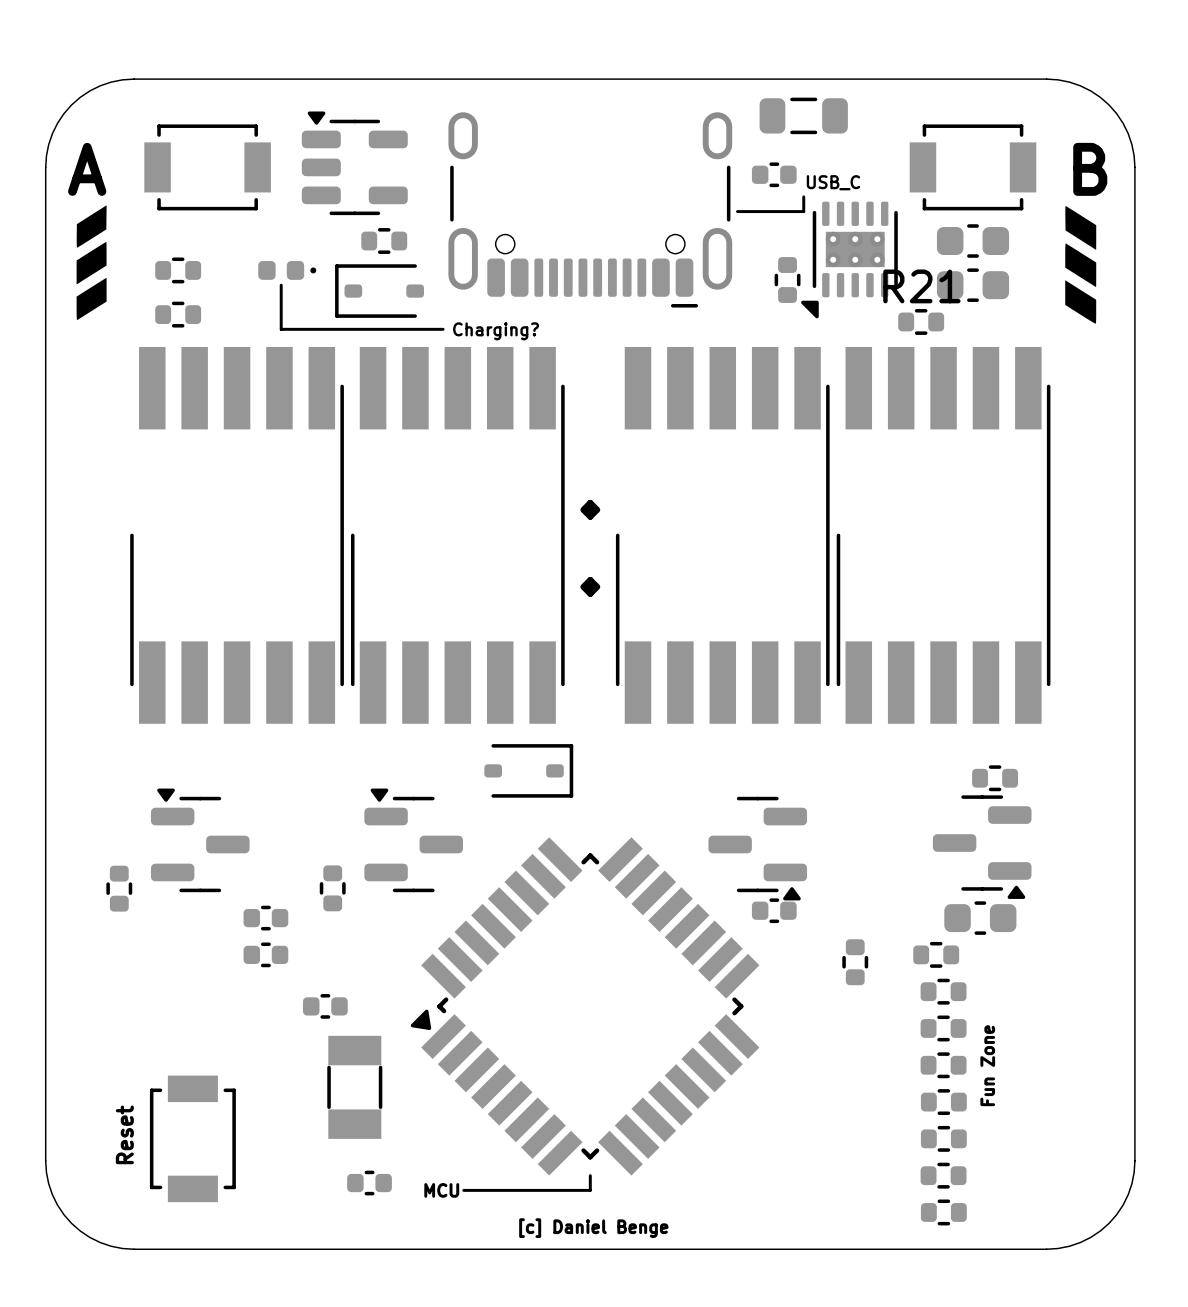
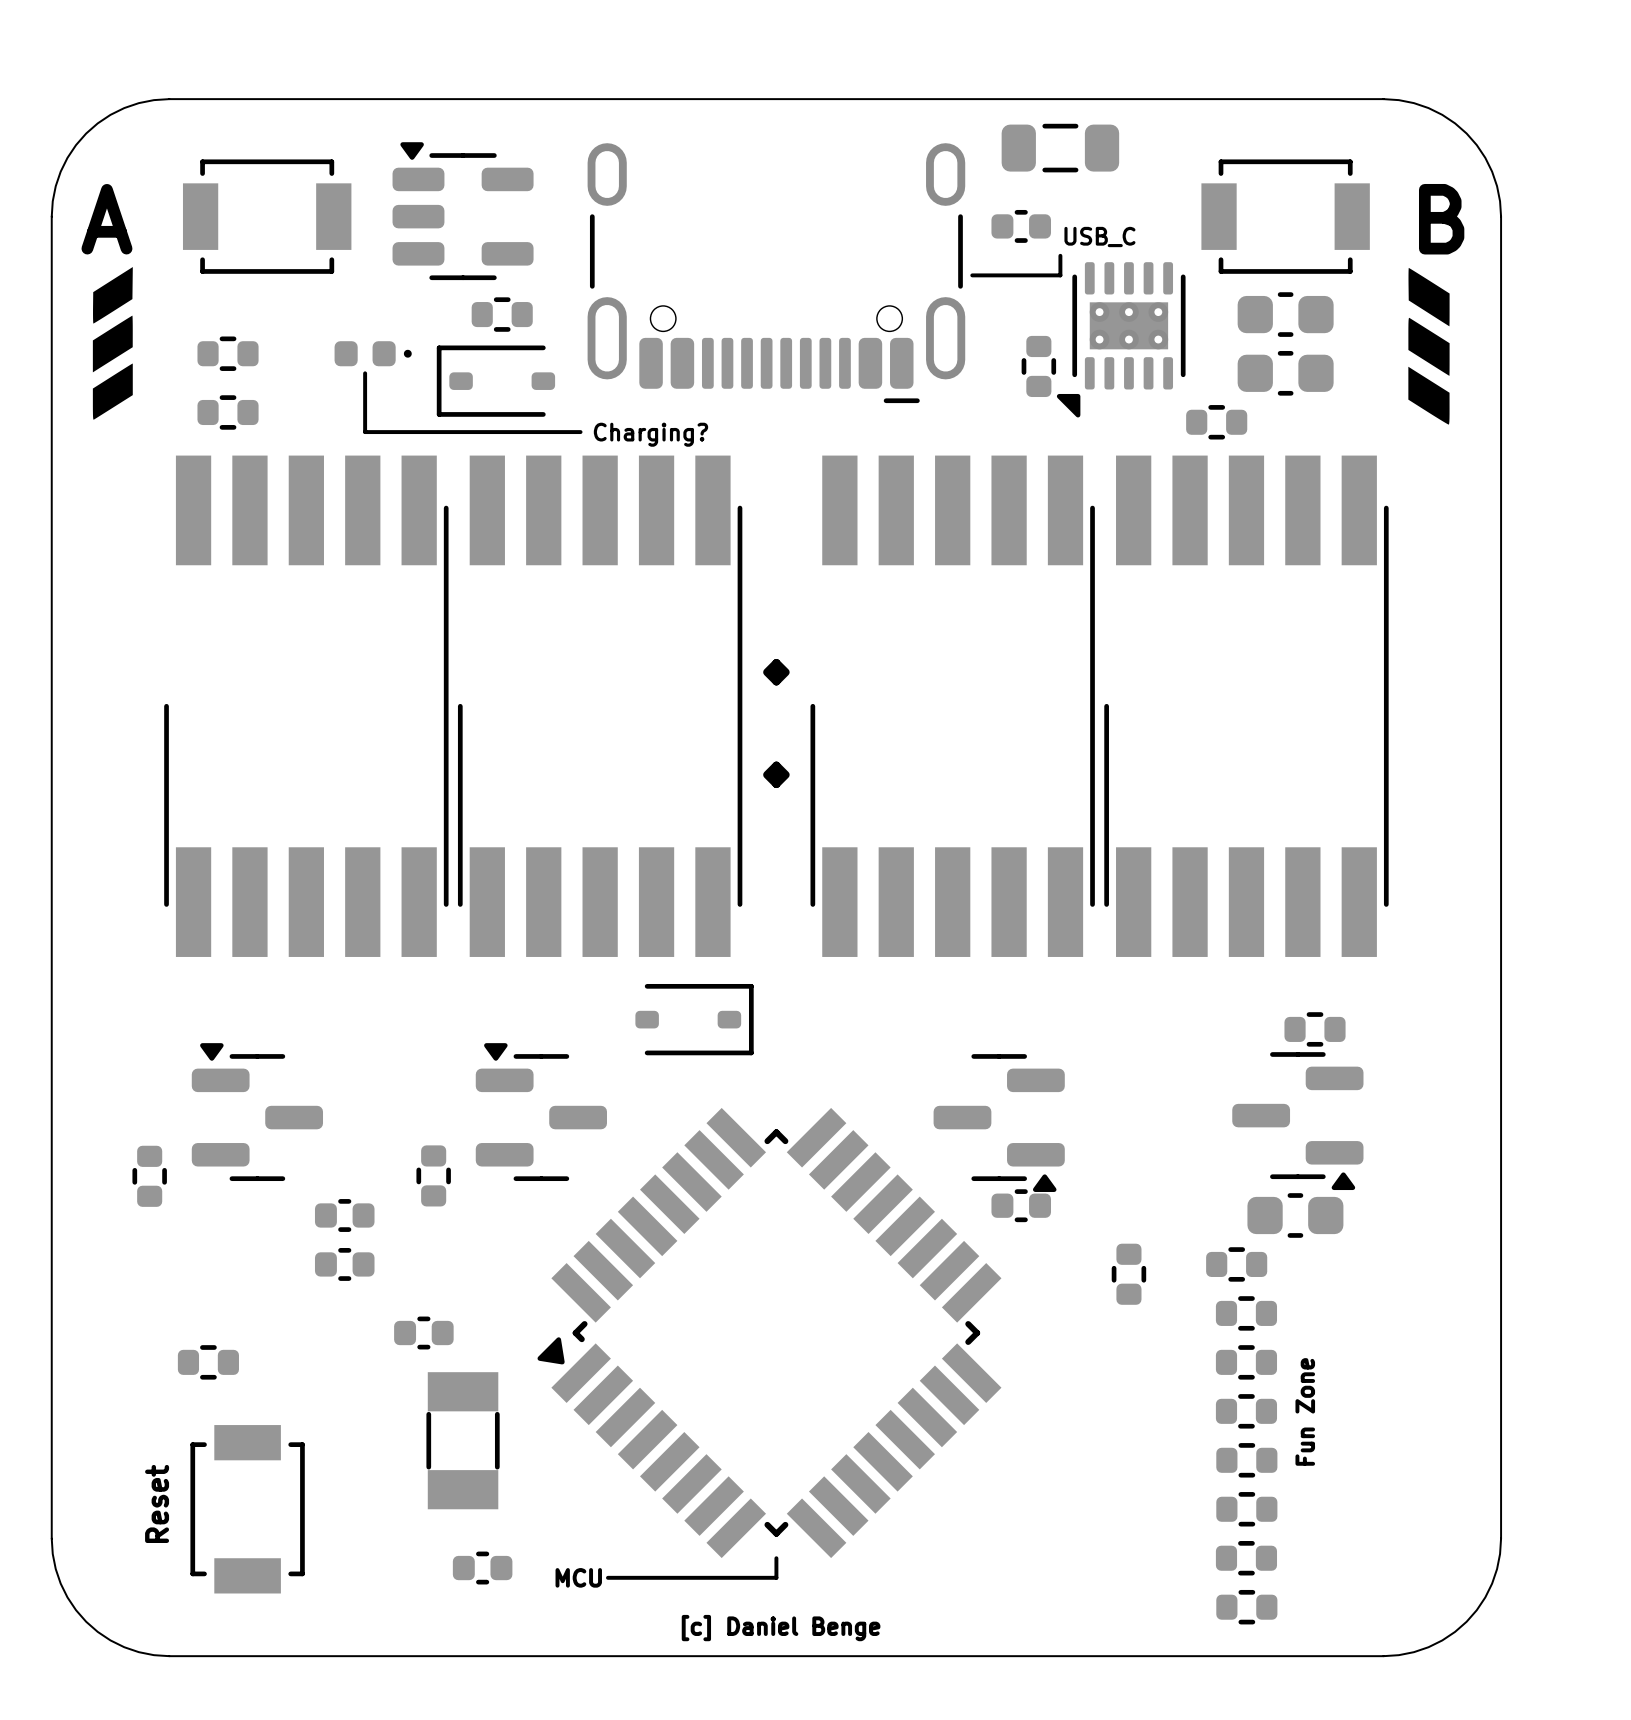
R21 name: R21 (921, 286) -> none
part: none -> (208, 1362)

